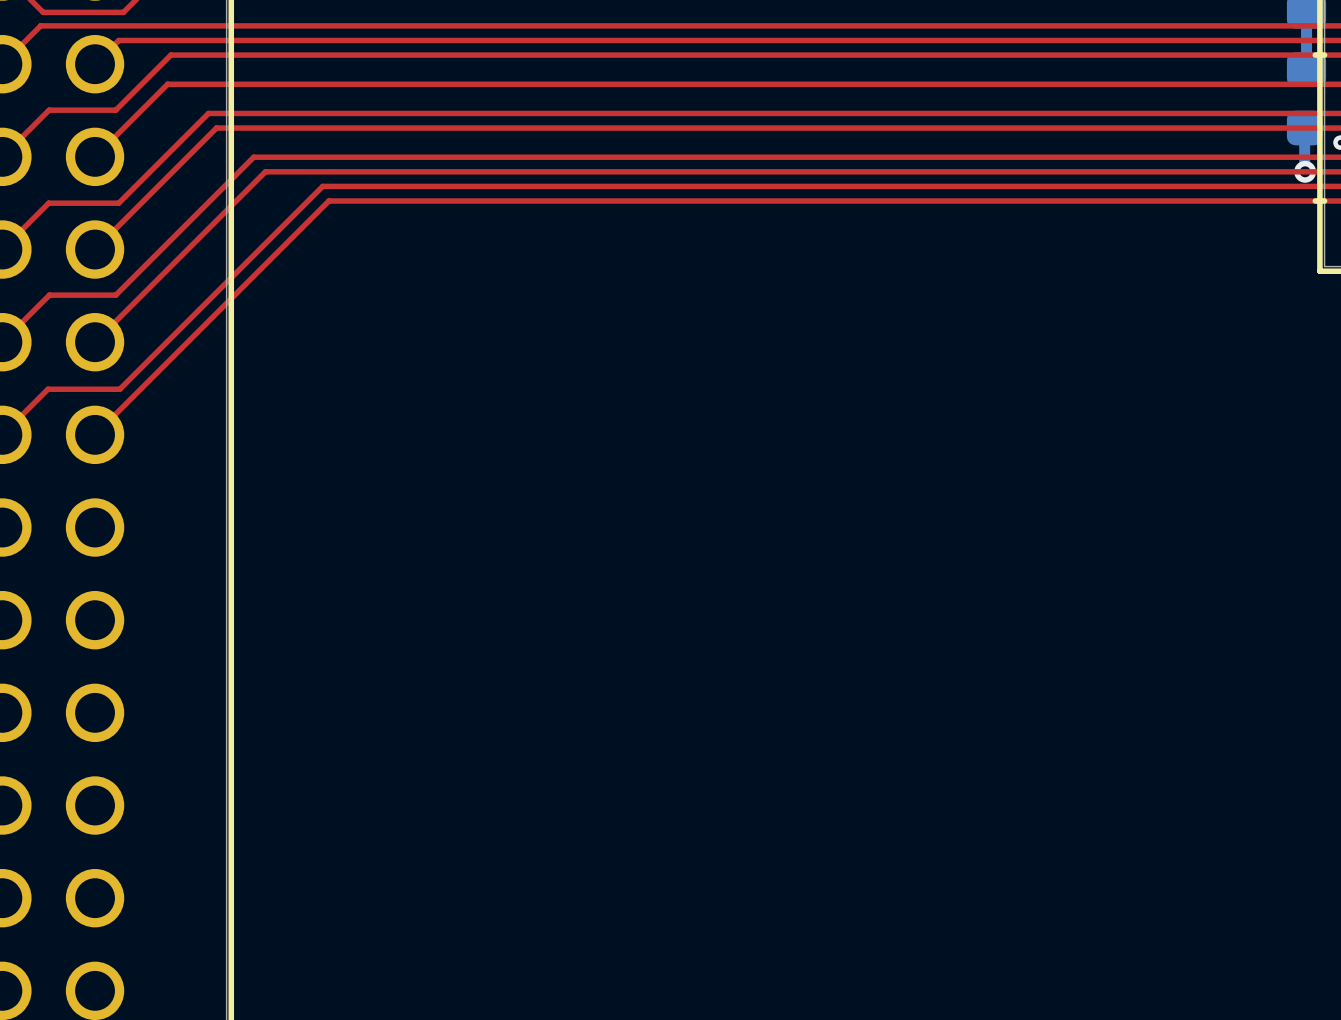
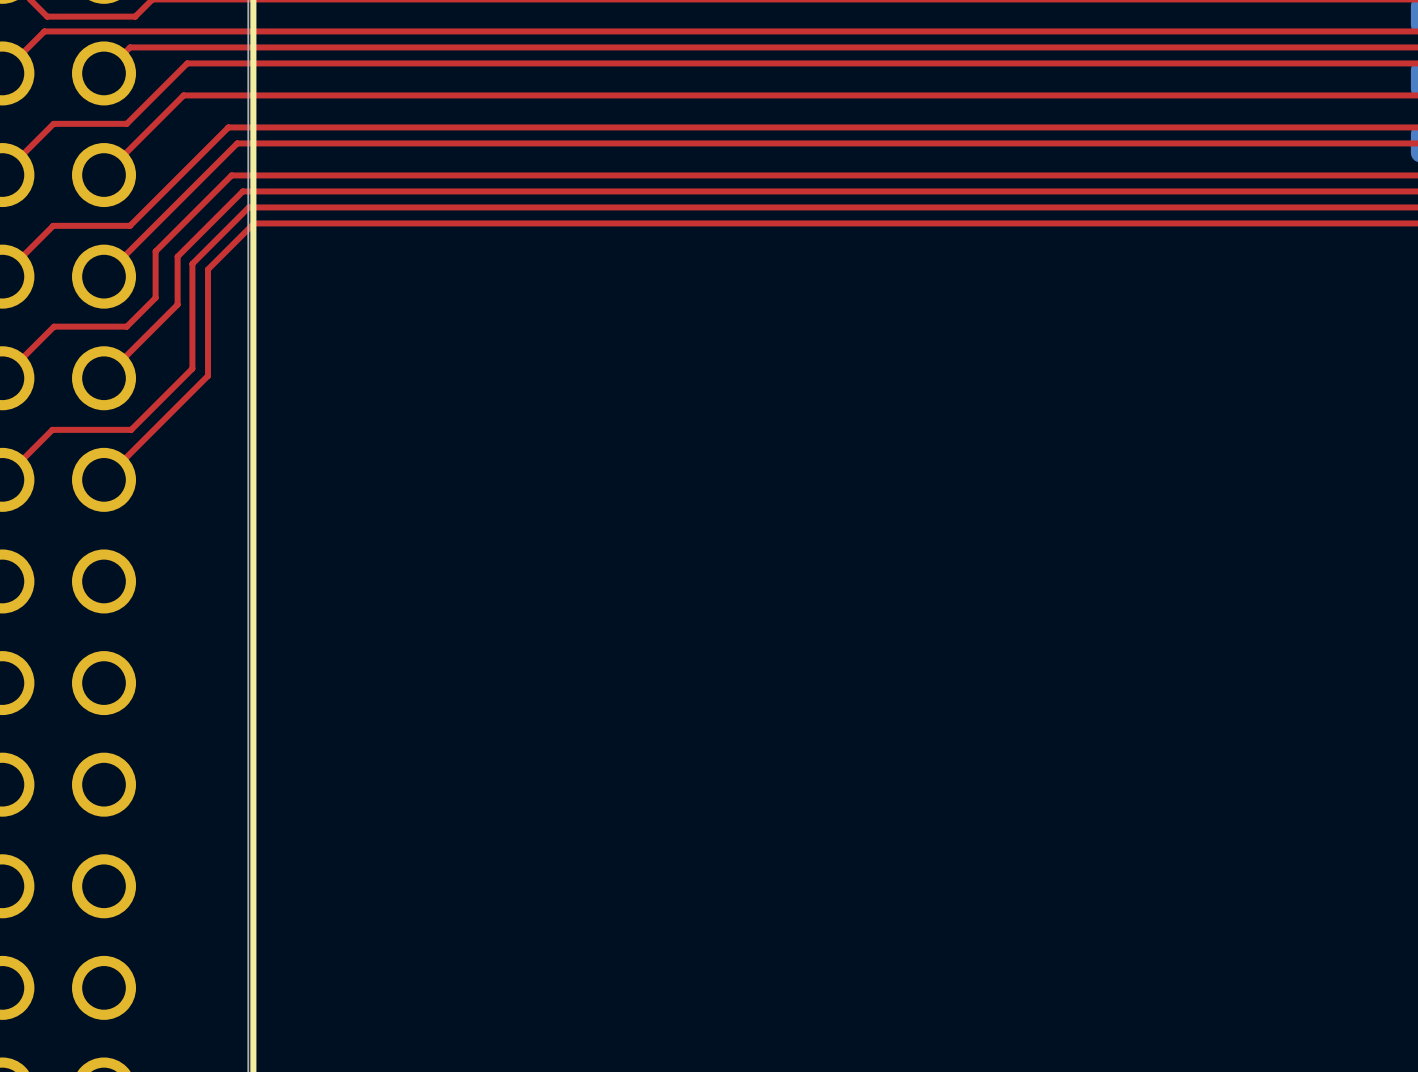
top track: (253, 157) (142, 268) -> (278, 175) (231, 175) (155, 251) (155, 297)
top track: (265, 171) (162, 275) -> (290, 191) (242, 191) (177, 256) (177, 304)
top track: (322, 186) (175, 333) -> (353, 207) (248, 207) (192, 263) (192, 368)
top track: (328, 201) (189, 340) -> (360, 223) (254, 223) (208, 269) (208, 375)

